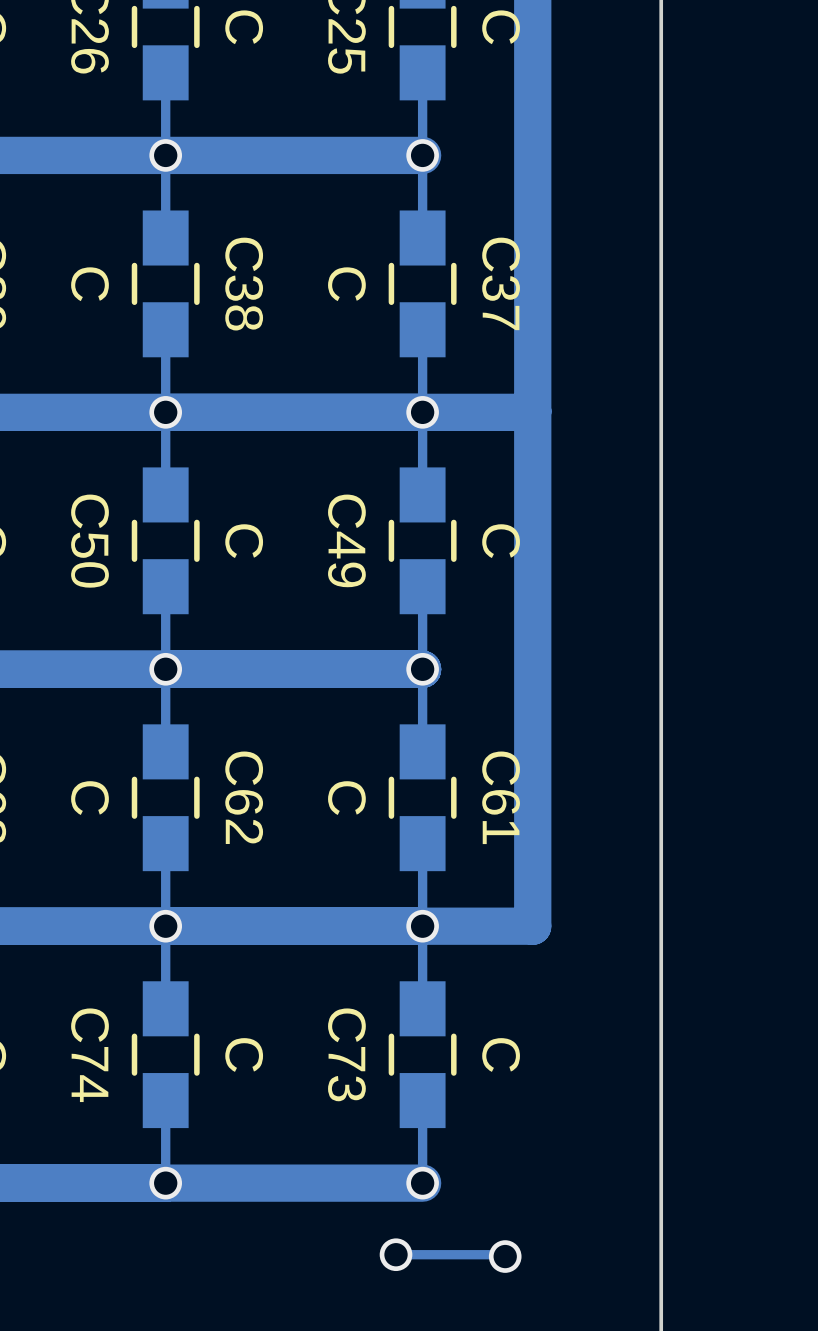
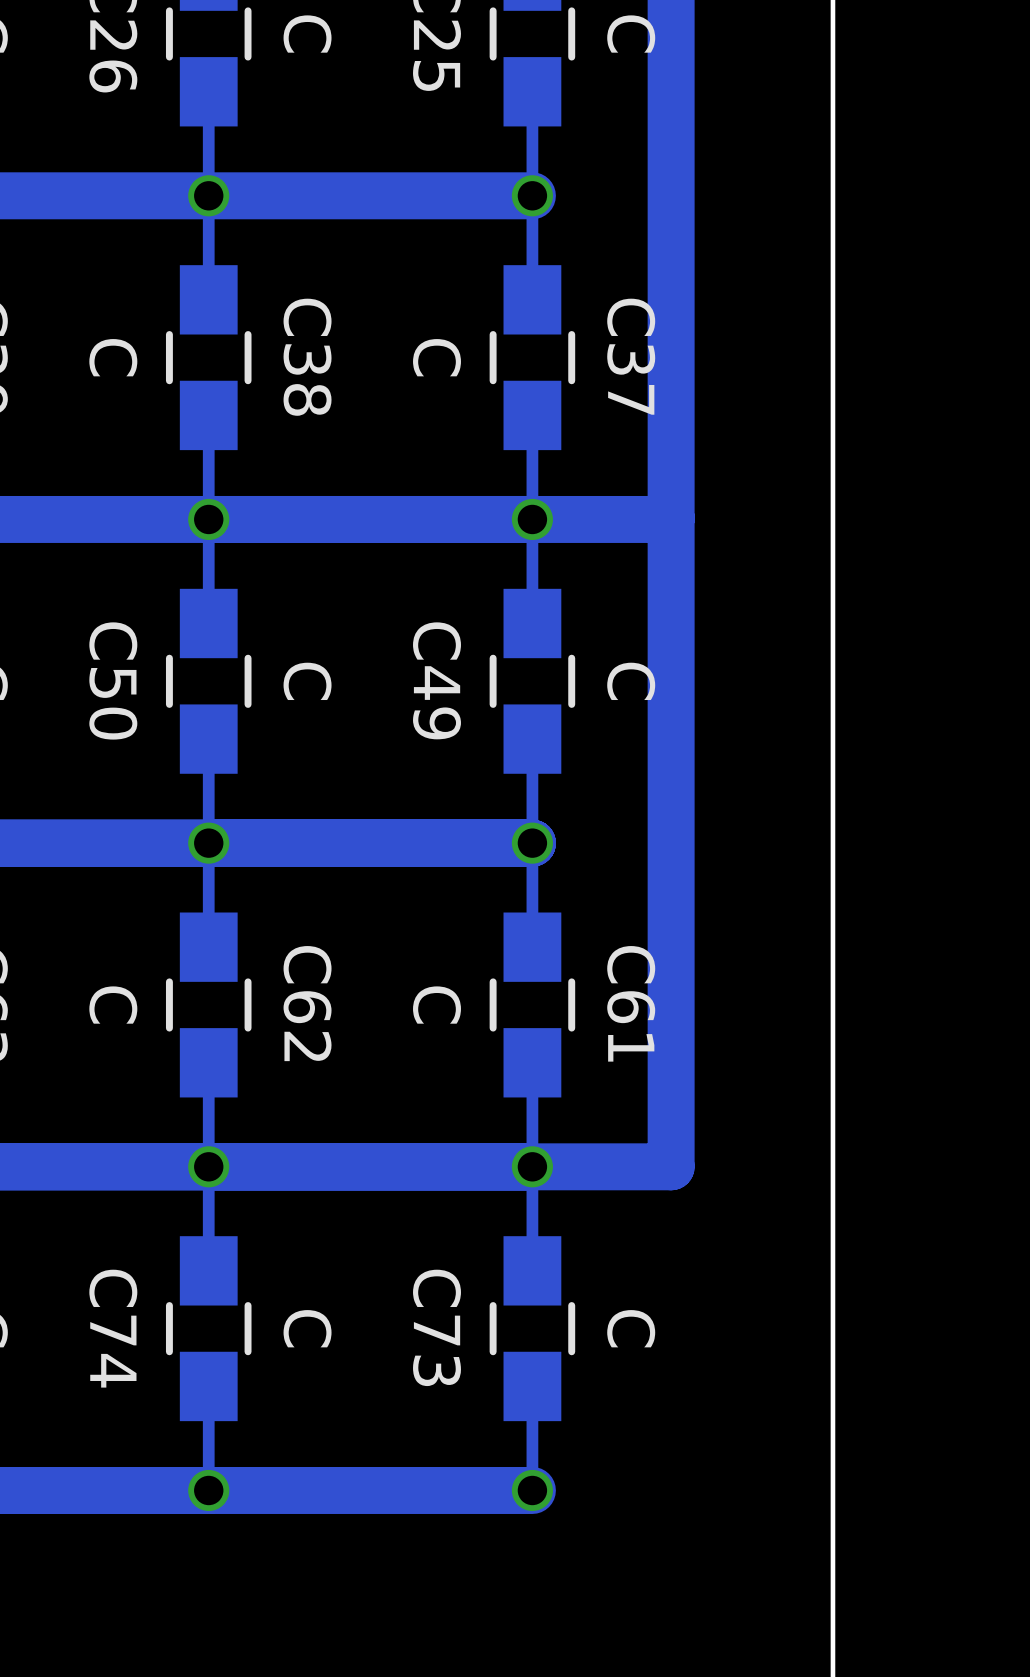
track: (396, 1254) (503, 1254) (505, 1256) -> none
via: (396, 1254) -> none
via: (505, 1256) -> none

